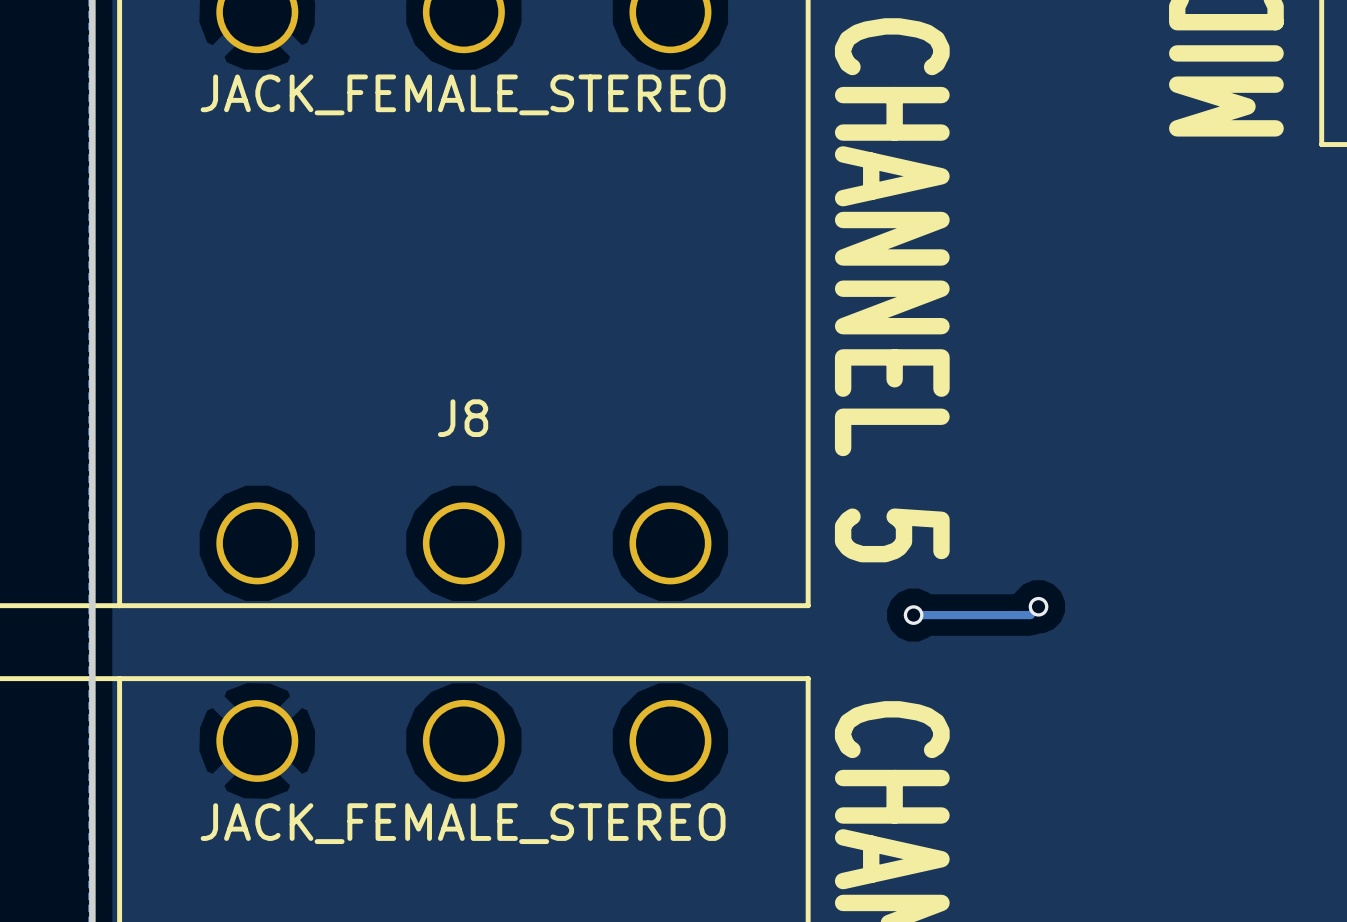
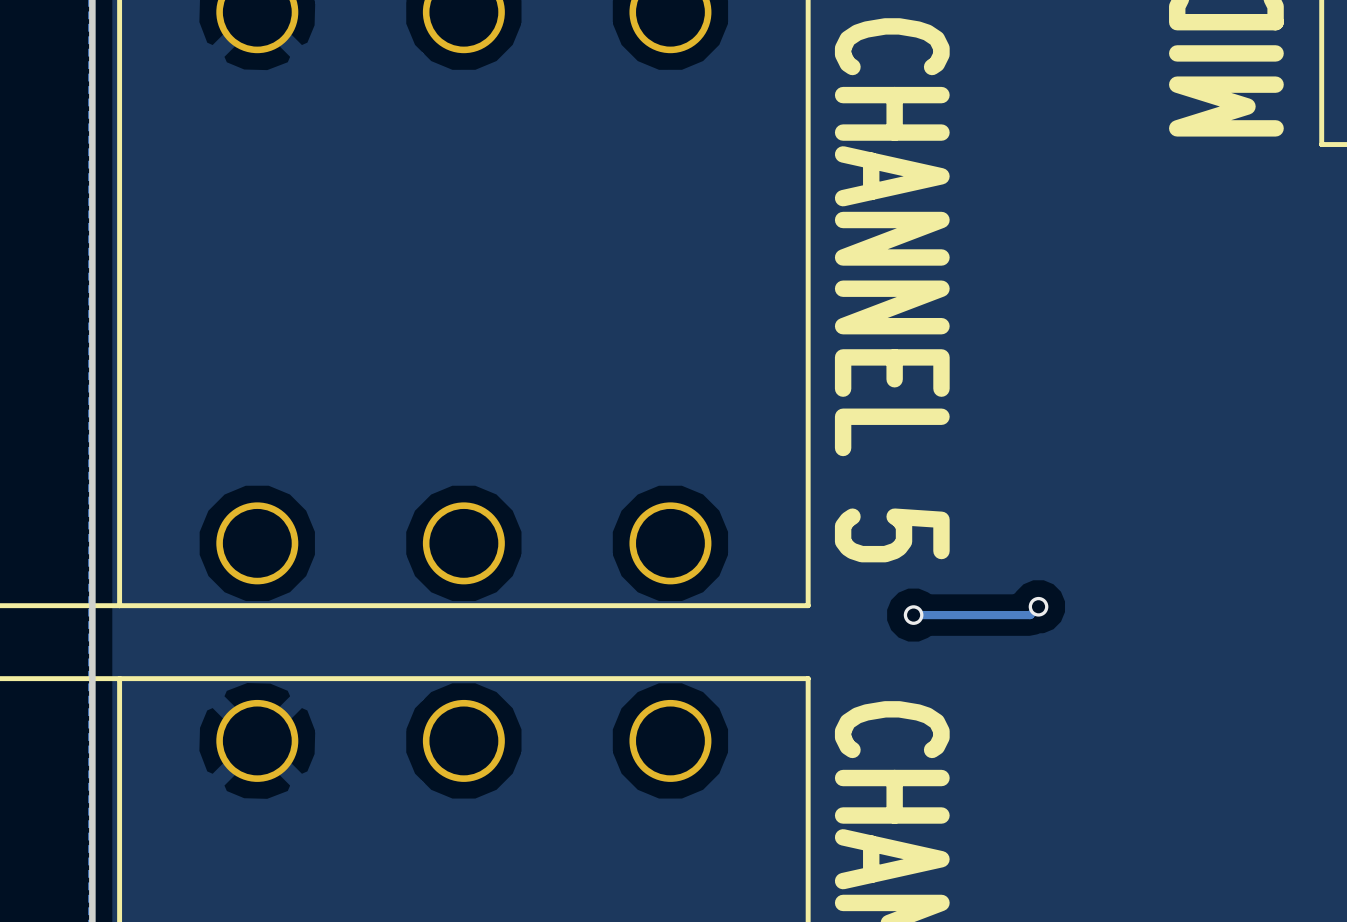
J8 value: JACK_FEMALE_STEREO (463, 94) -> none
J8 name: J8 (463, 418) -> none
part value: JACK_FEMALE_STEREO (463, 823) -> none

